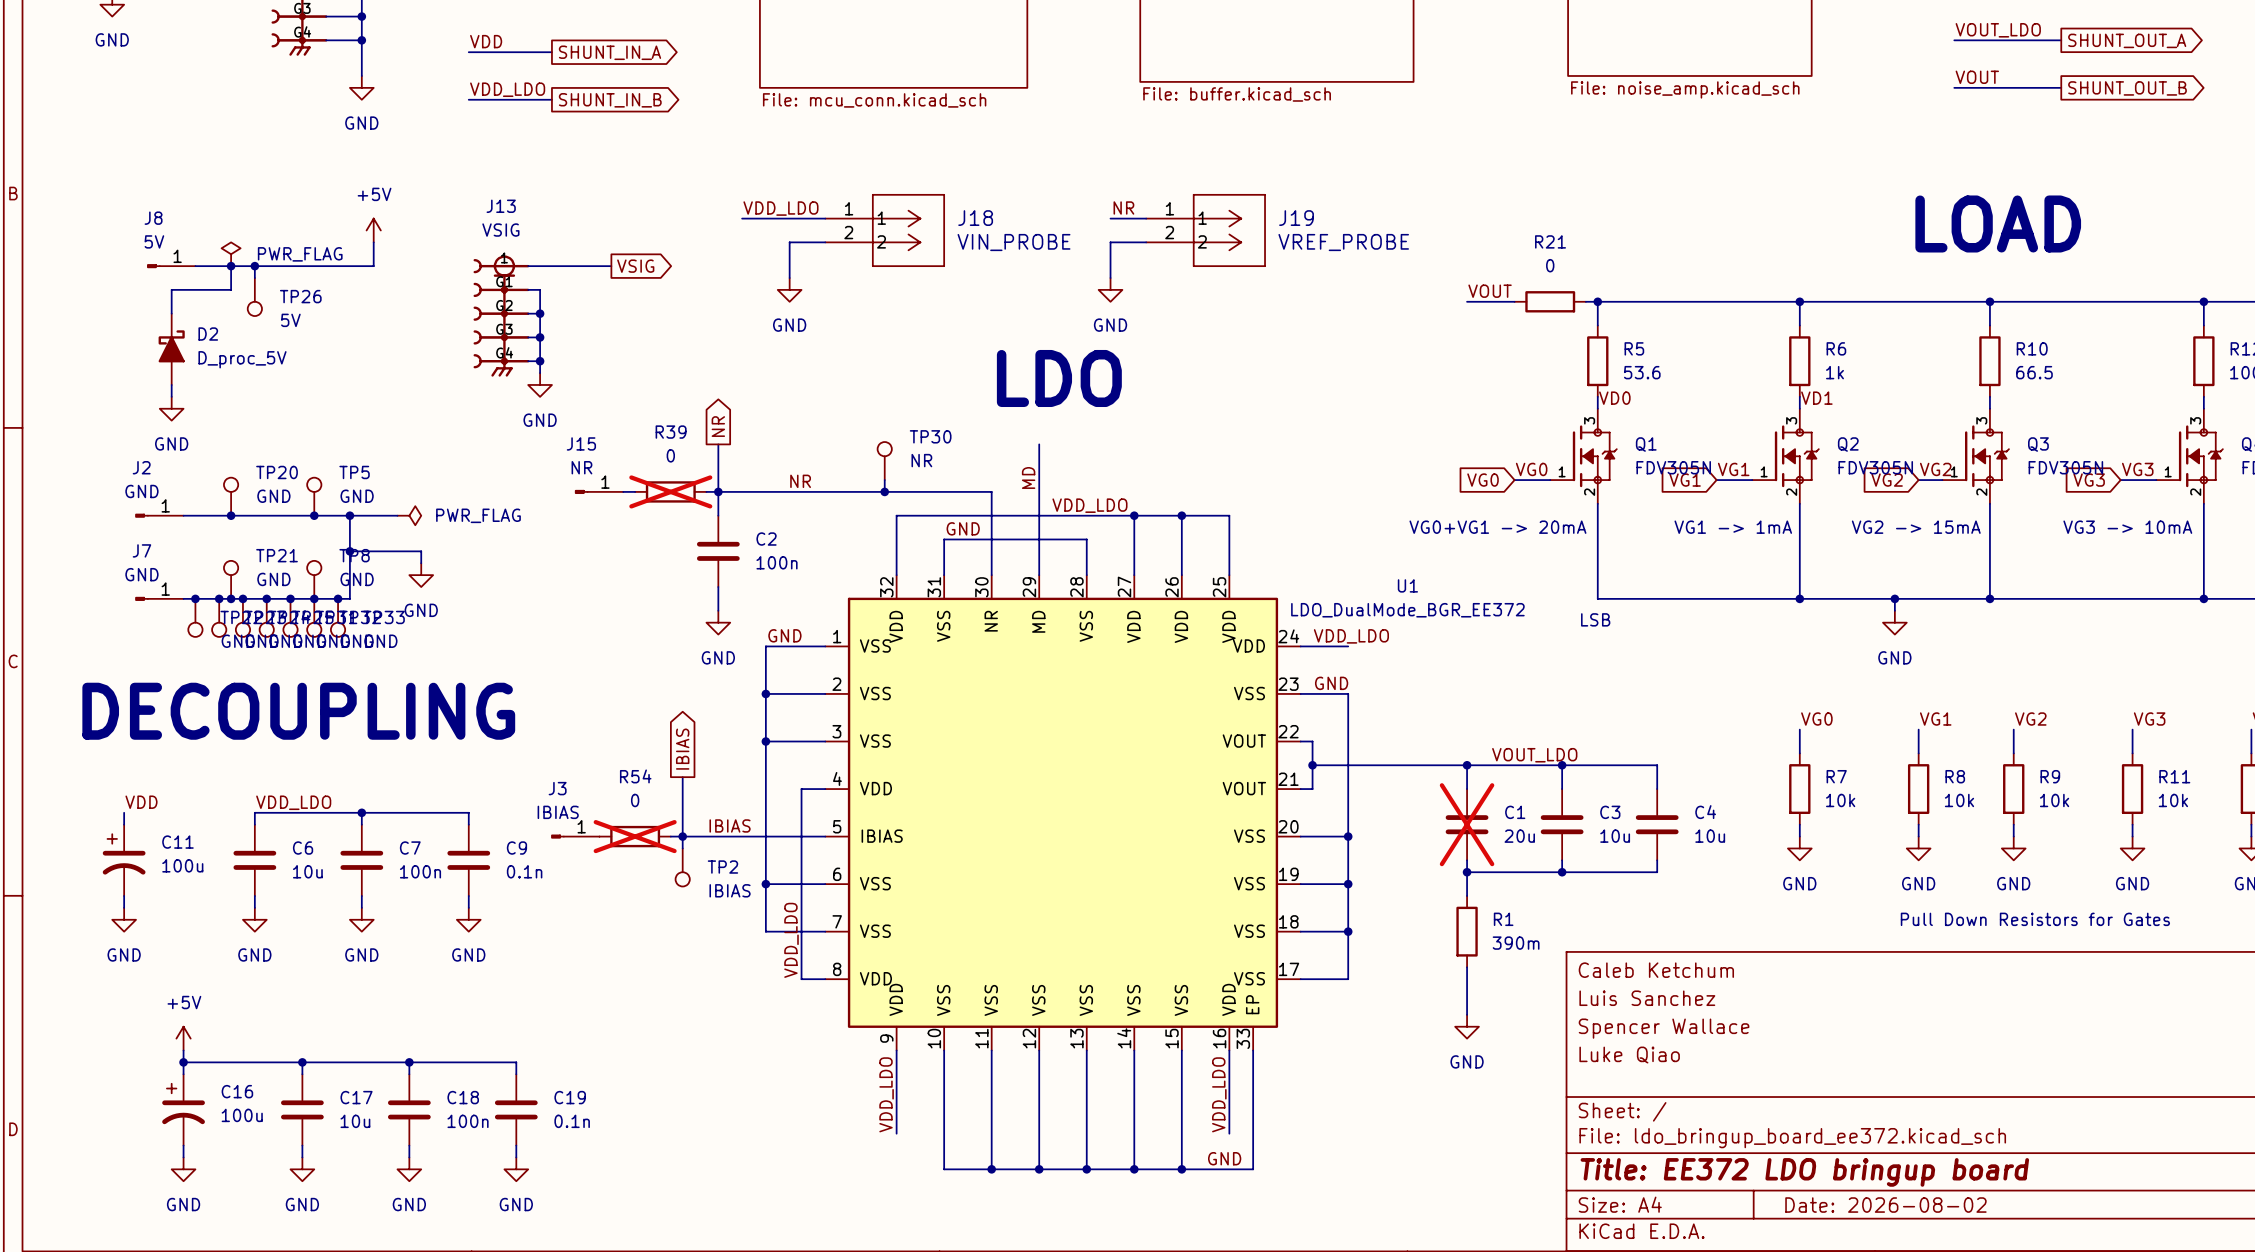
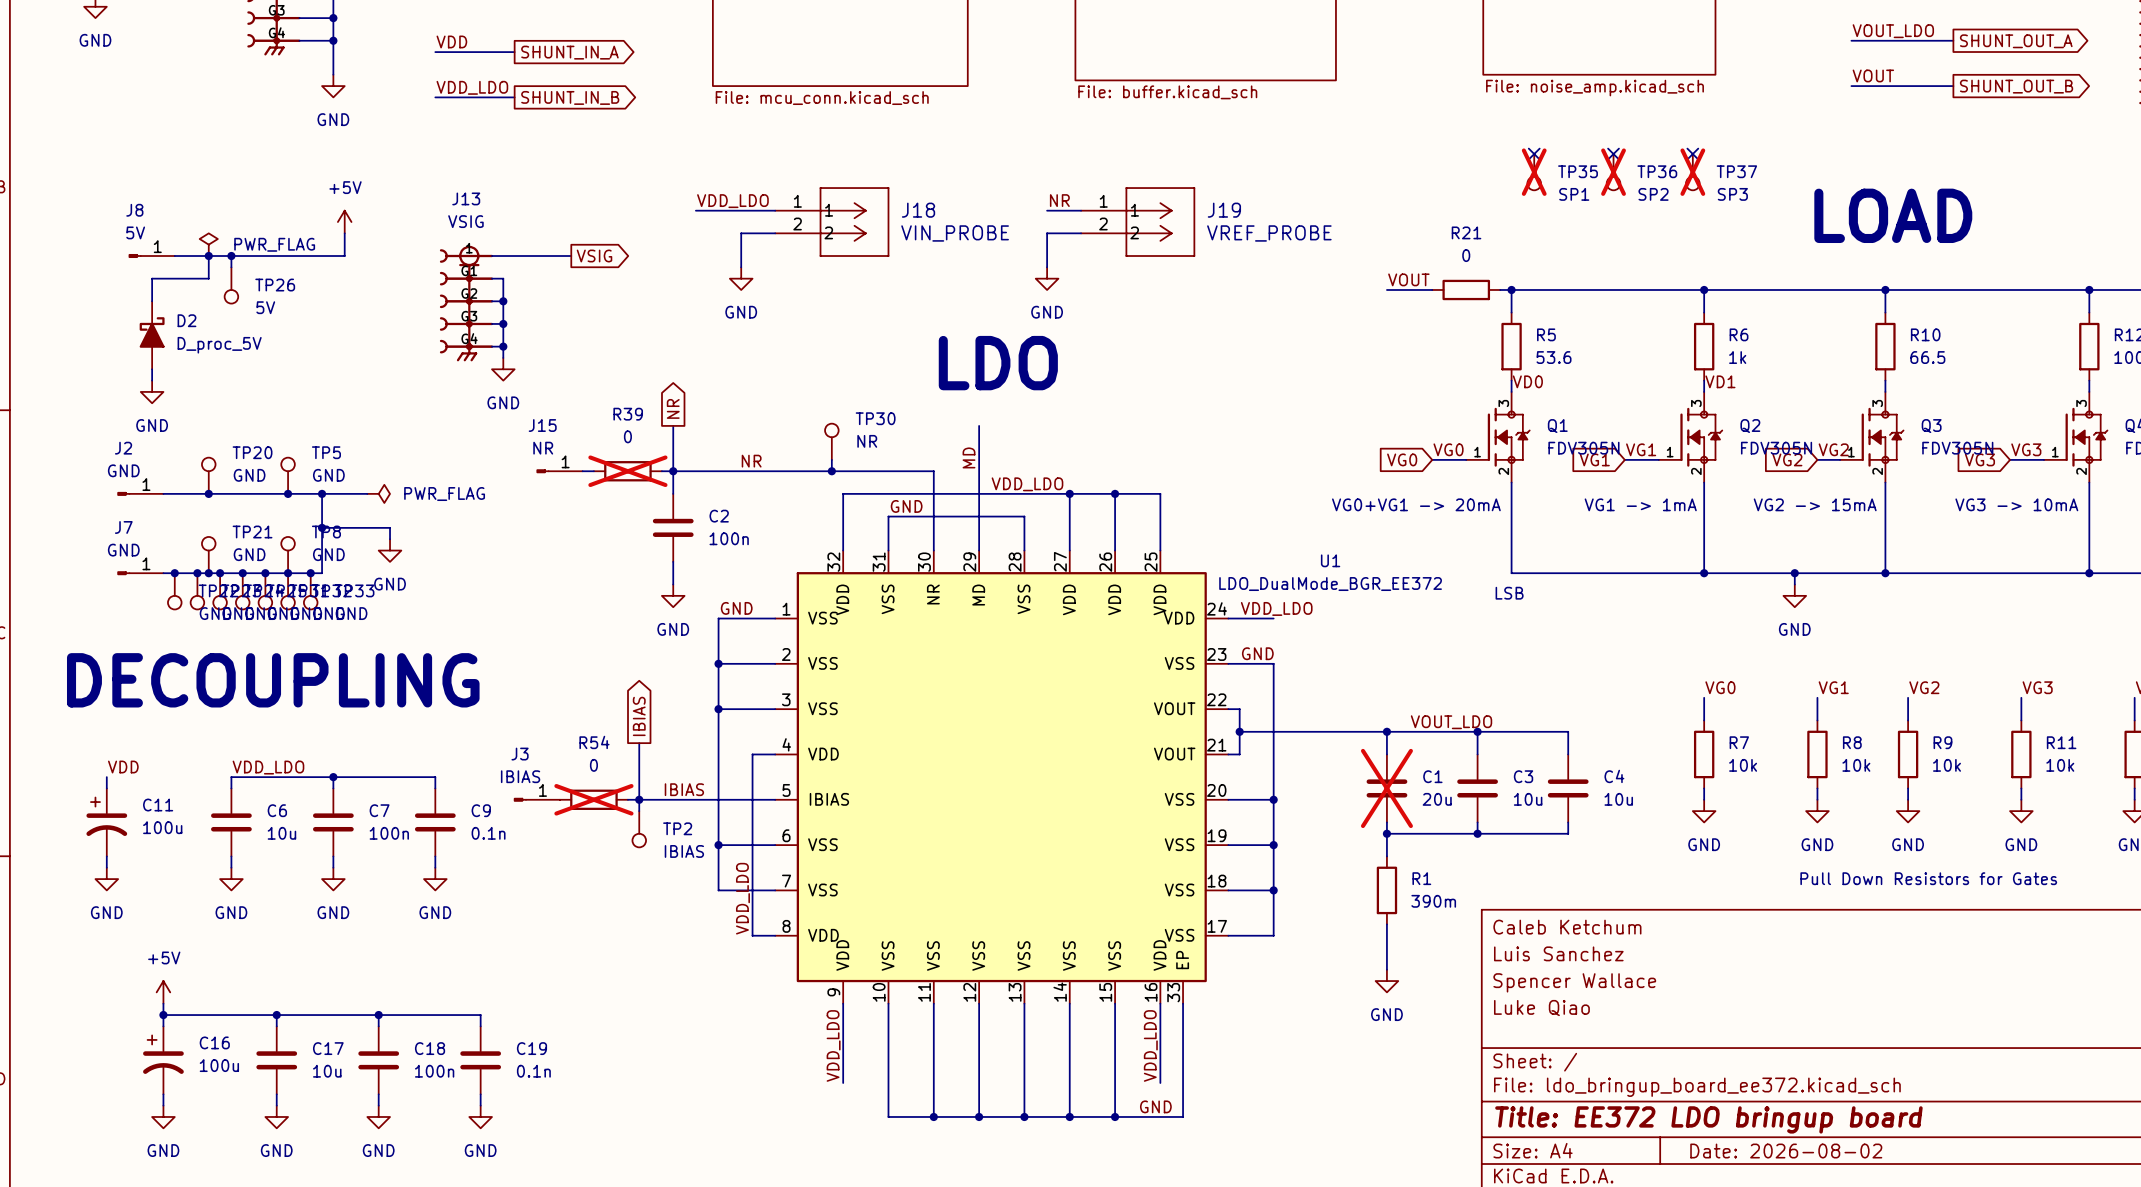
no-connect mark: none -> (1534, 154)
no-connect mark: none -> (1613, 154)
no-connect mark: none -> (1692, 154)
TP35: none -> SP1 (1534, 172)
TP36: none -> SP2 (1613, 172)
TP37: none -> SP3 (1692, 172)

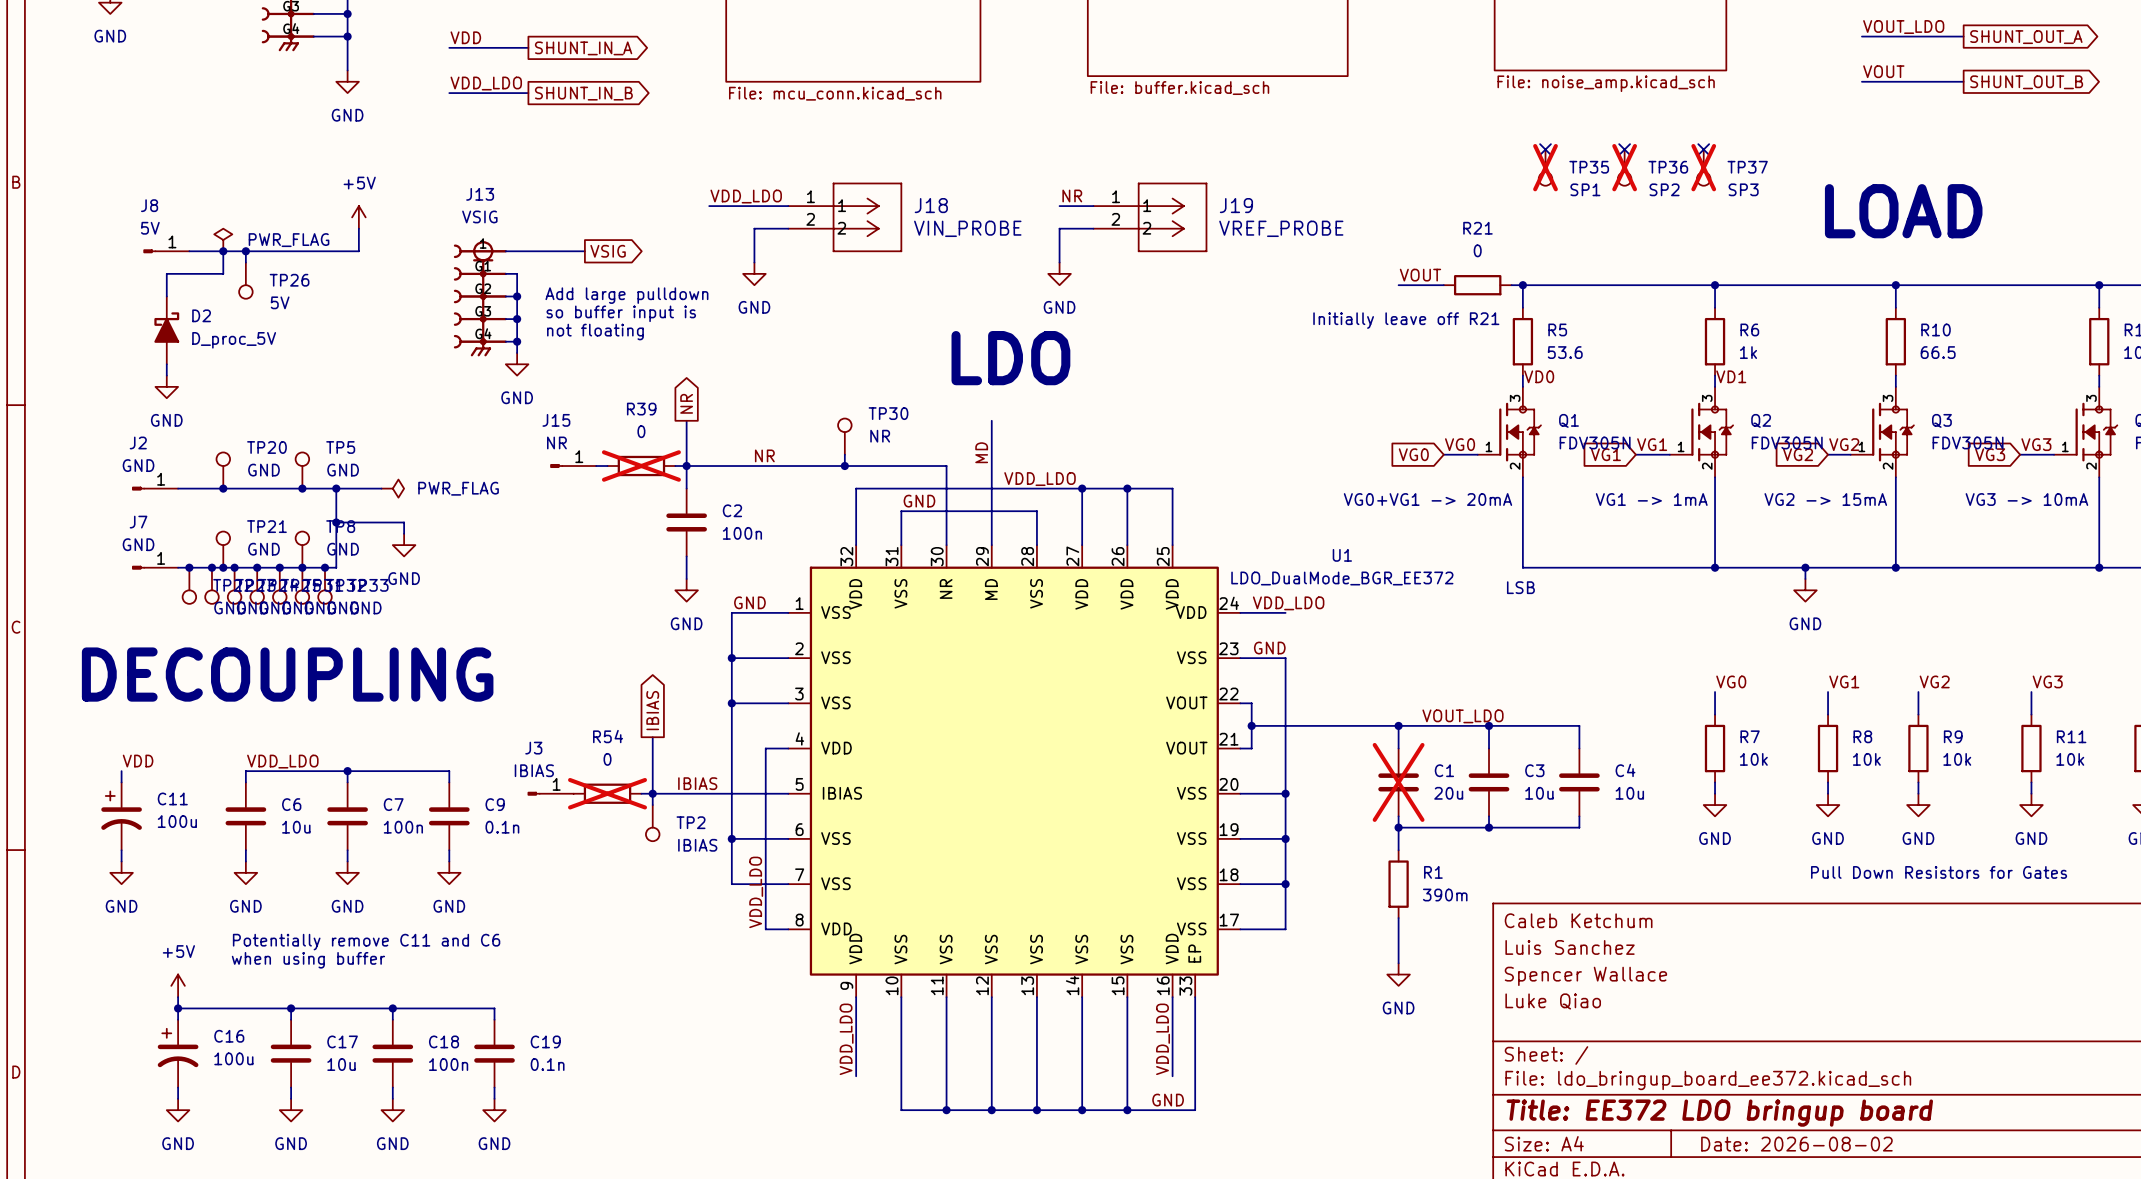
text: none -> Add large pulldown (626, 295)
text: none -> so buffer input is (621, 313)
text: none -> Initially leave off R21 (1406, 320)
text: none -> not floating (595, 332)
text: none -> Potentially remove C11 and C6 (366, 942)
text: none -> when using buffer (308, 960)

